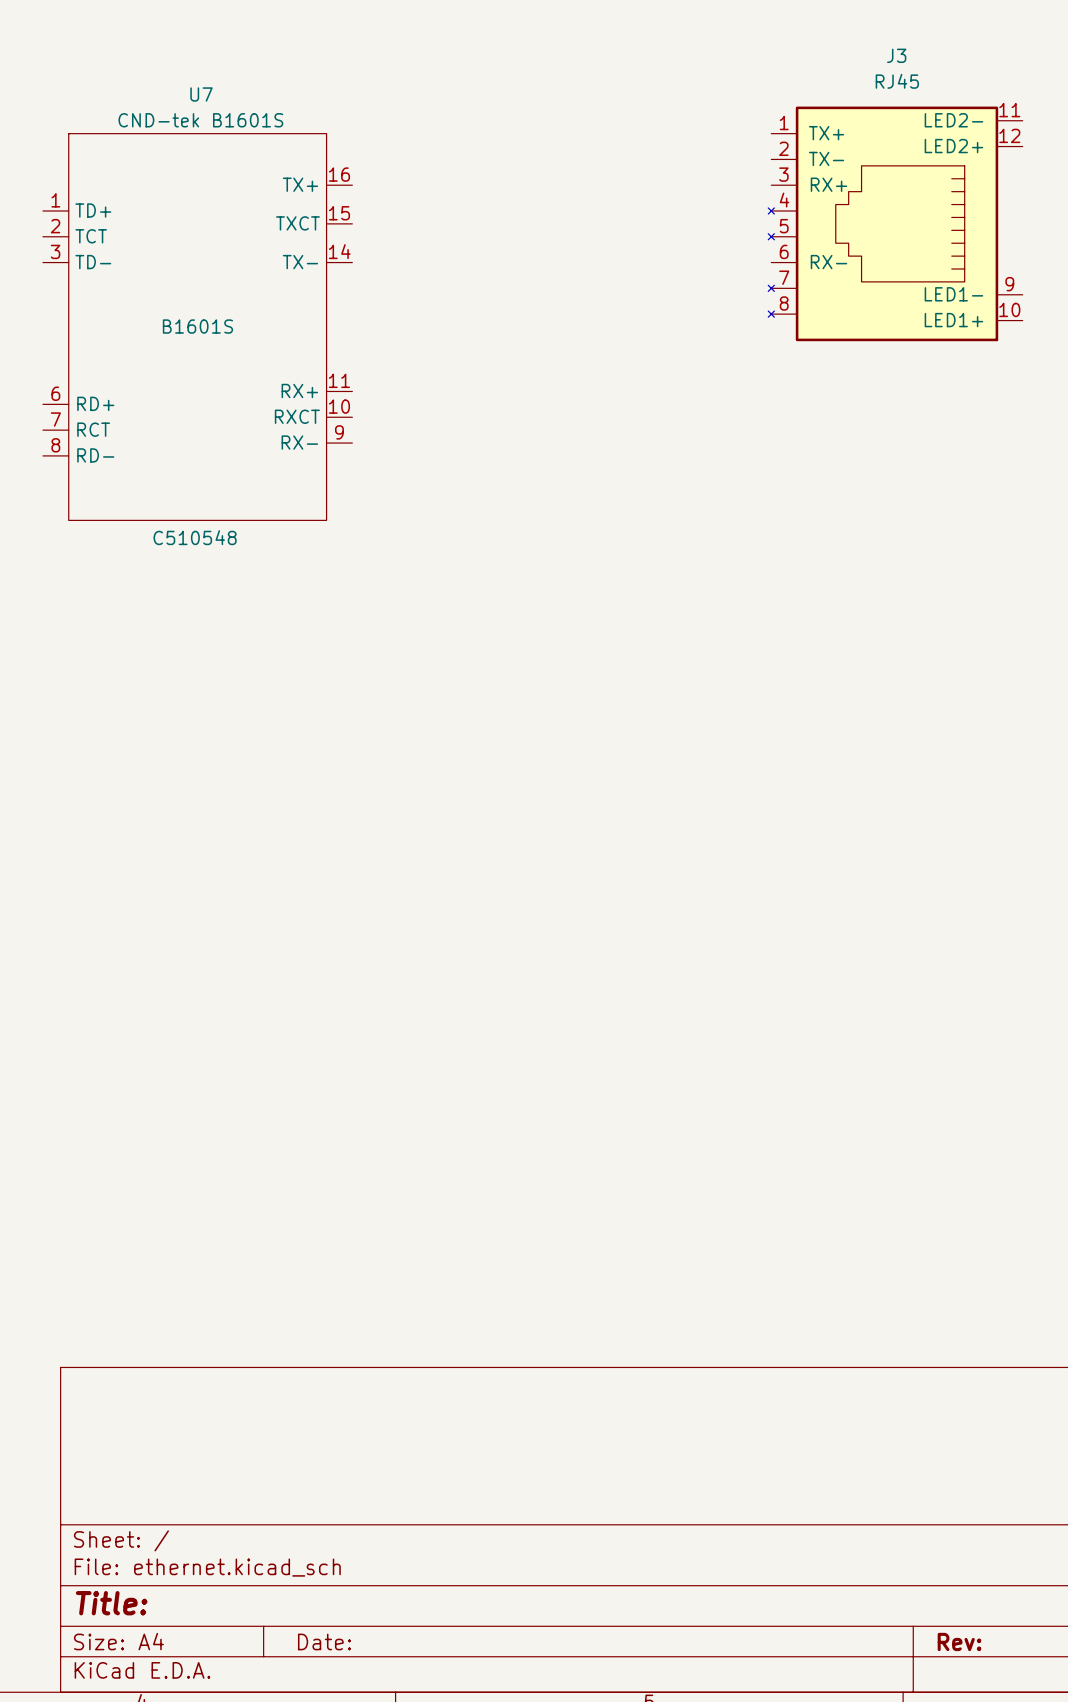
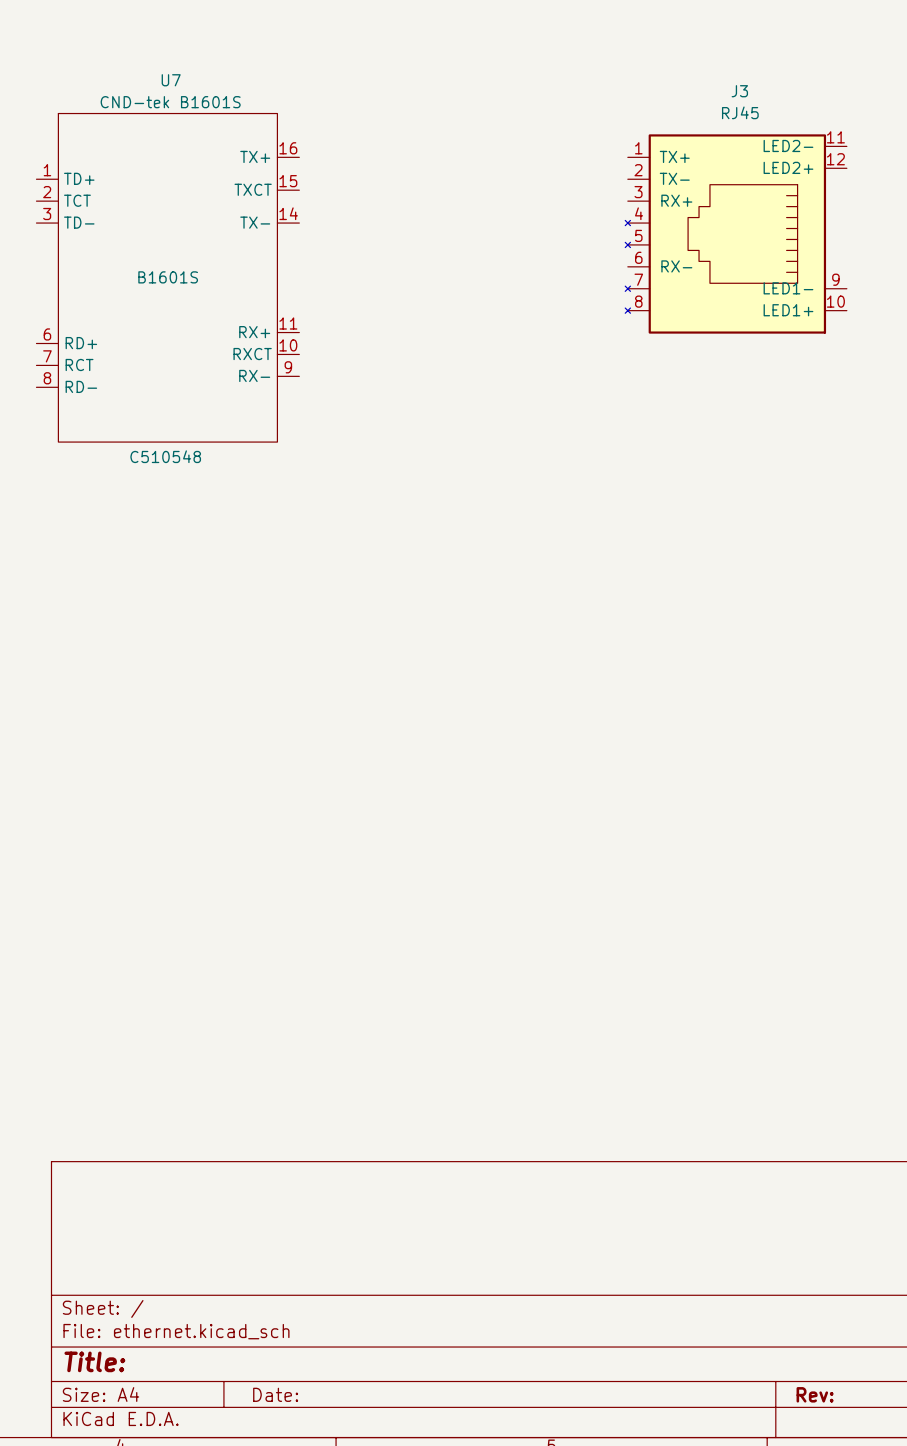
J3 symbol: [768, 106, 1023, 342] -> [625, 134, 847, 334]

